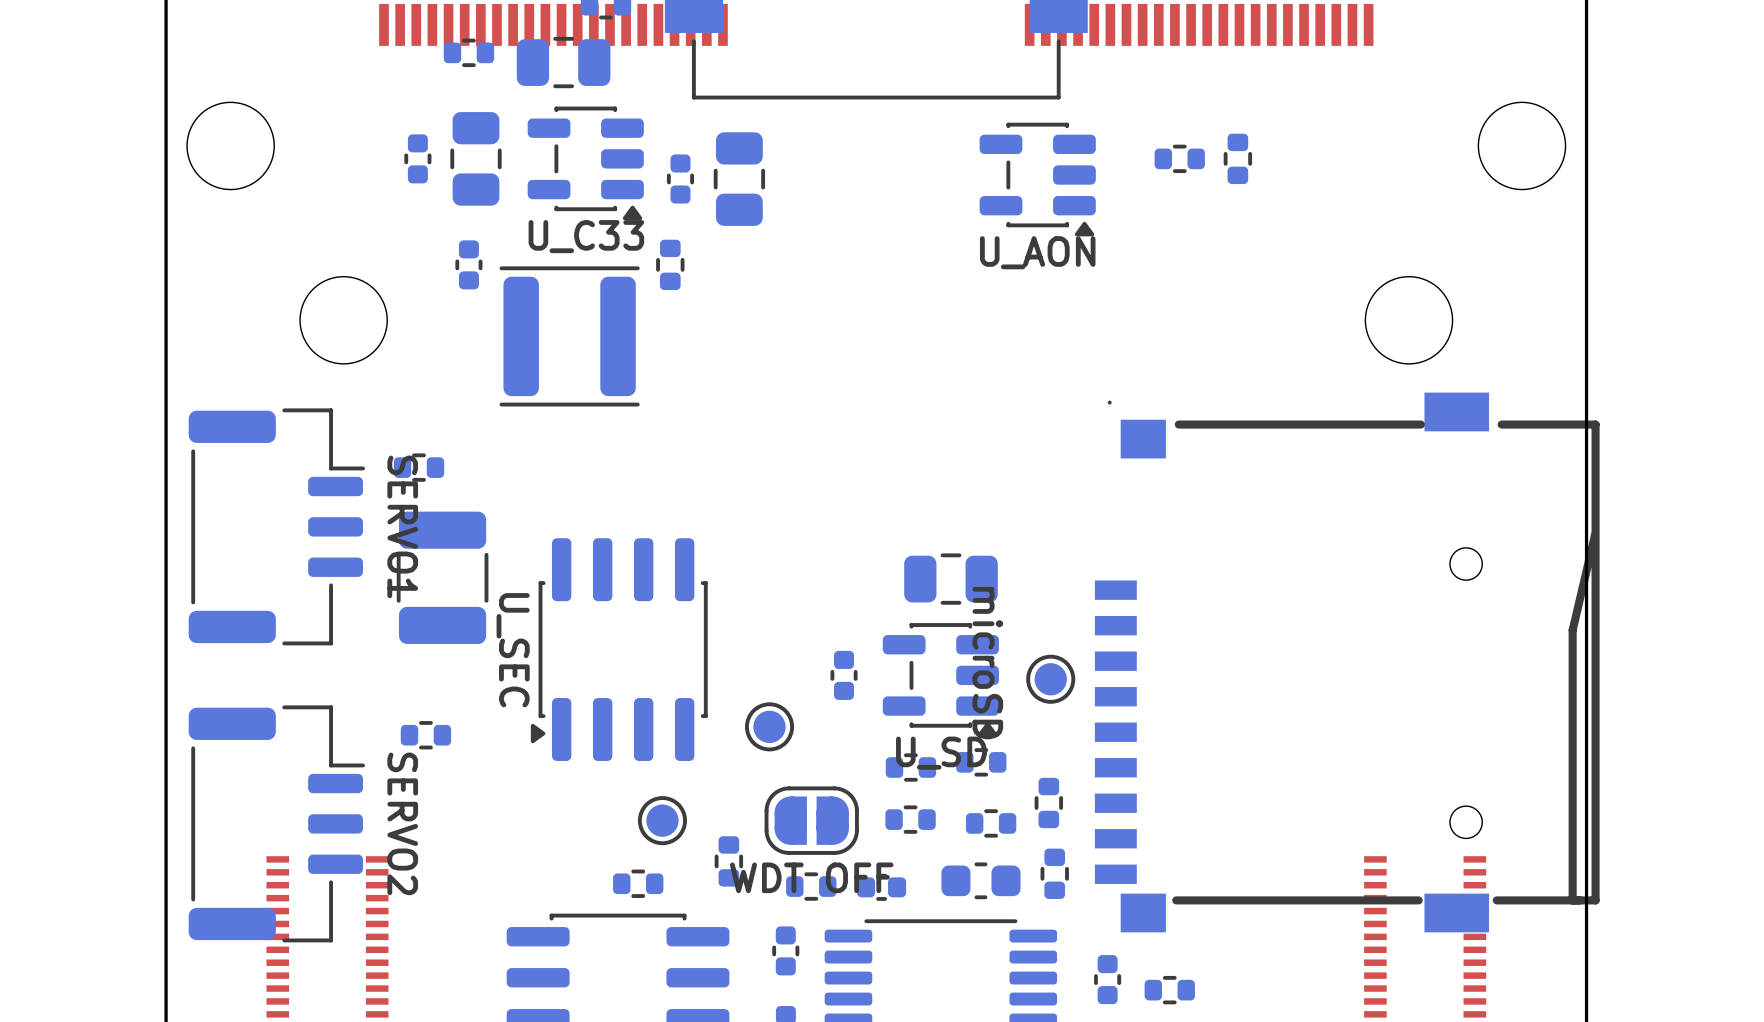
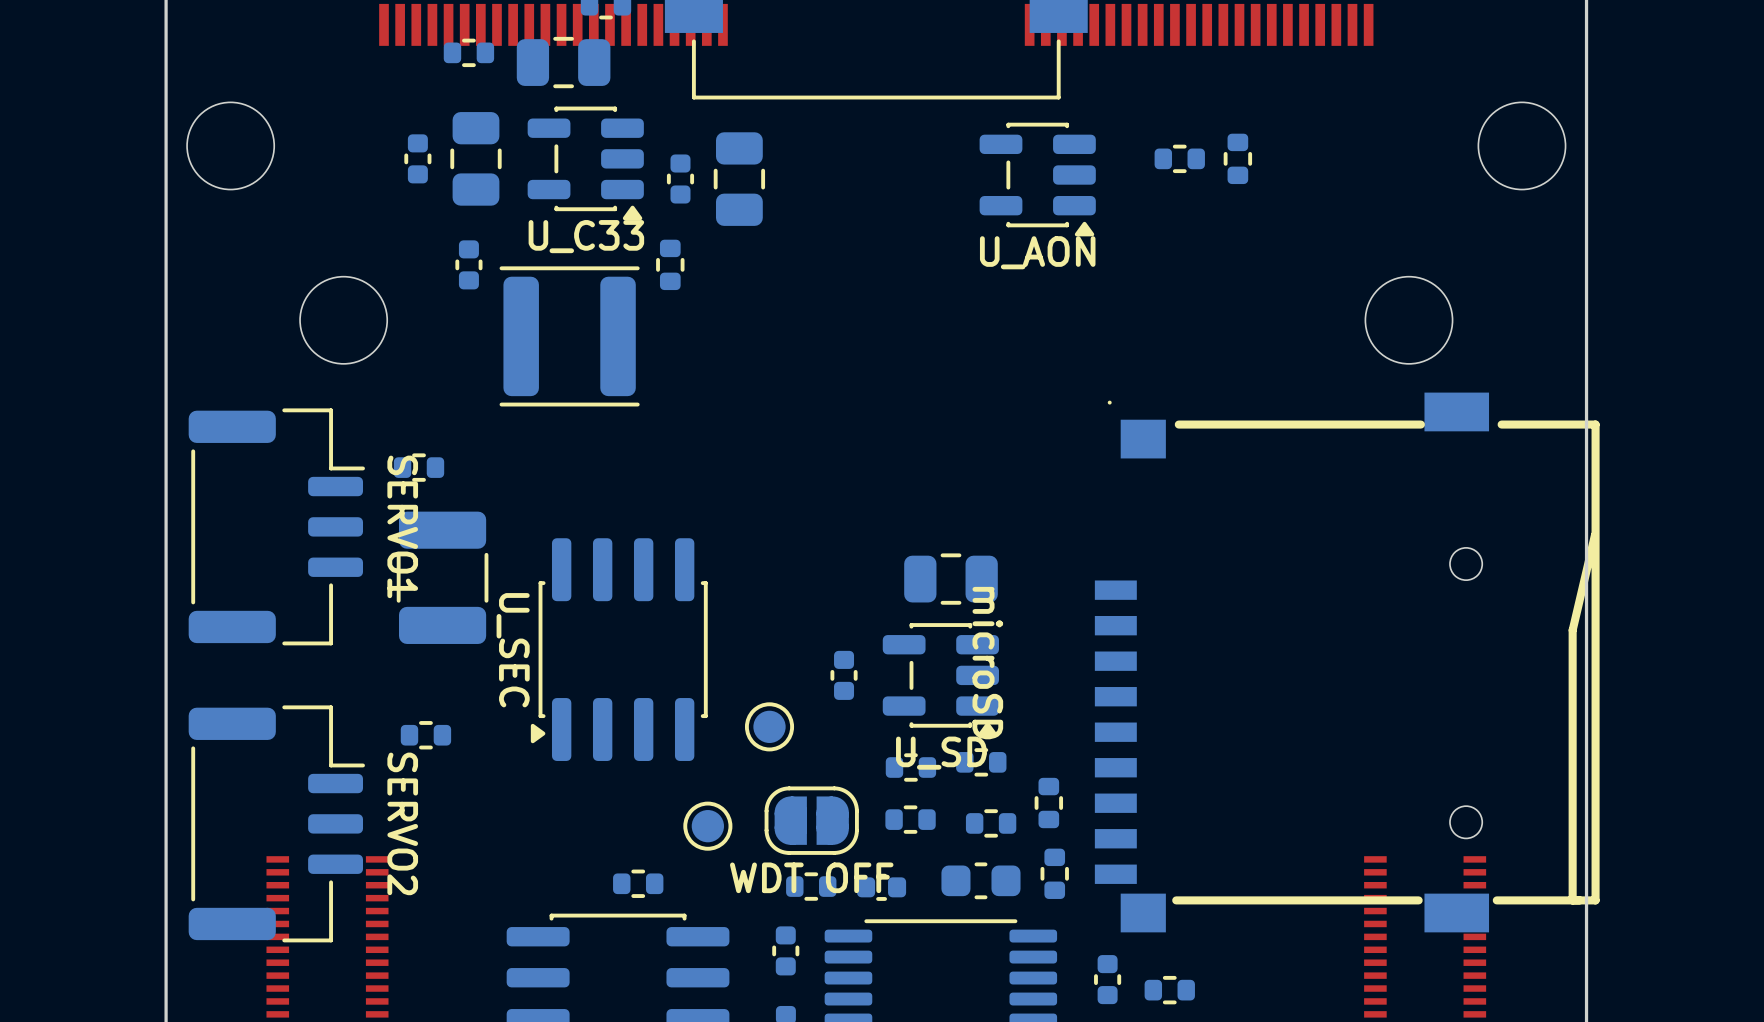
part: (1050, 679) -> none
part position: (662, 820) -> (707, 826)
part: (728, 861) -> none

